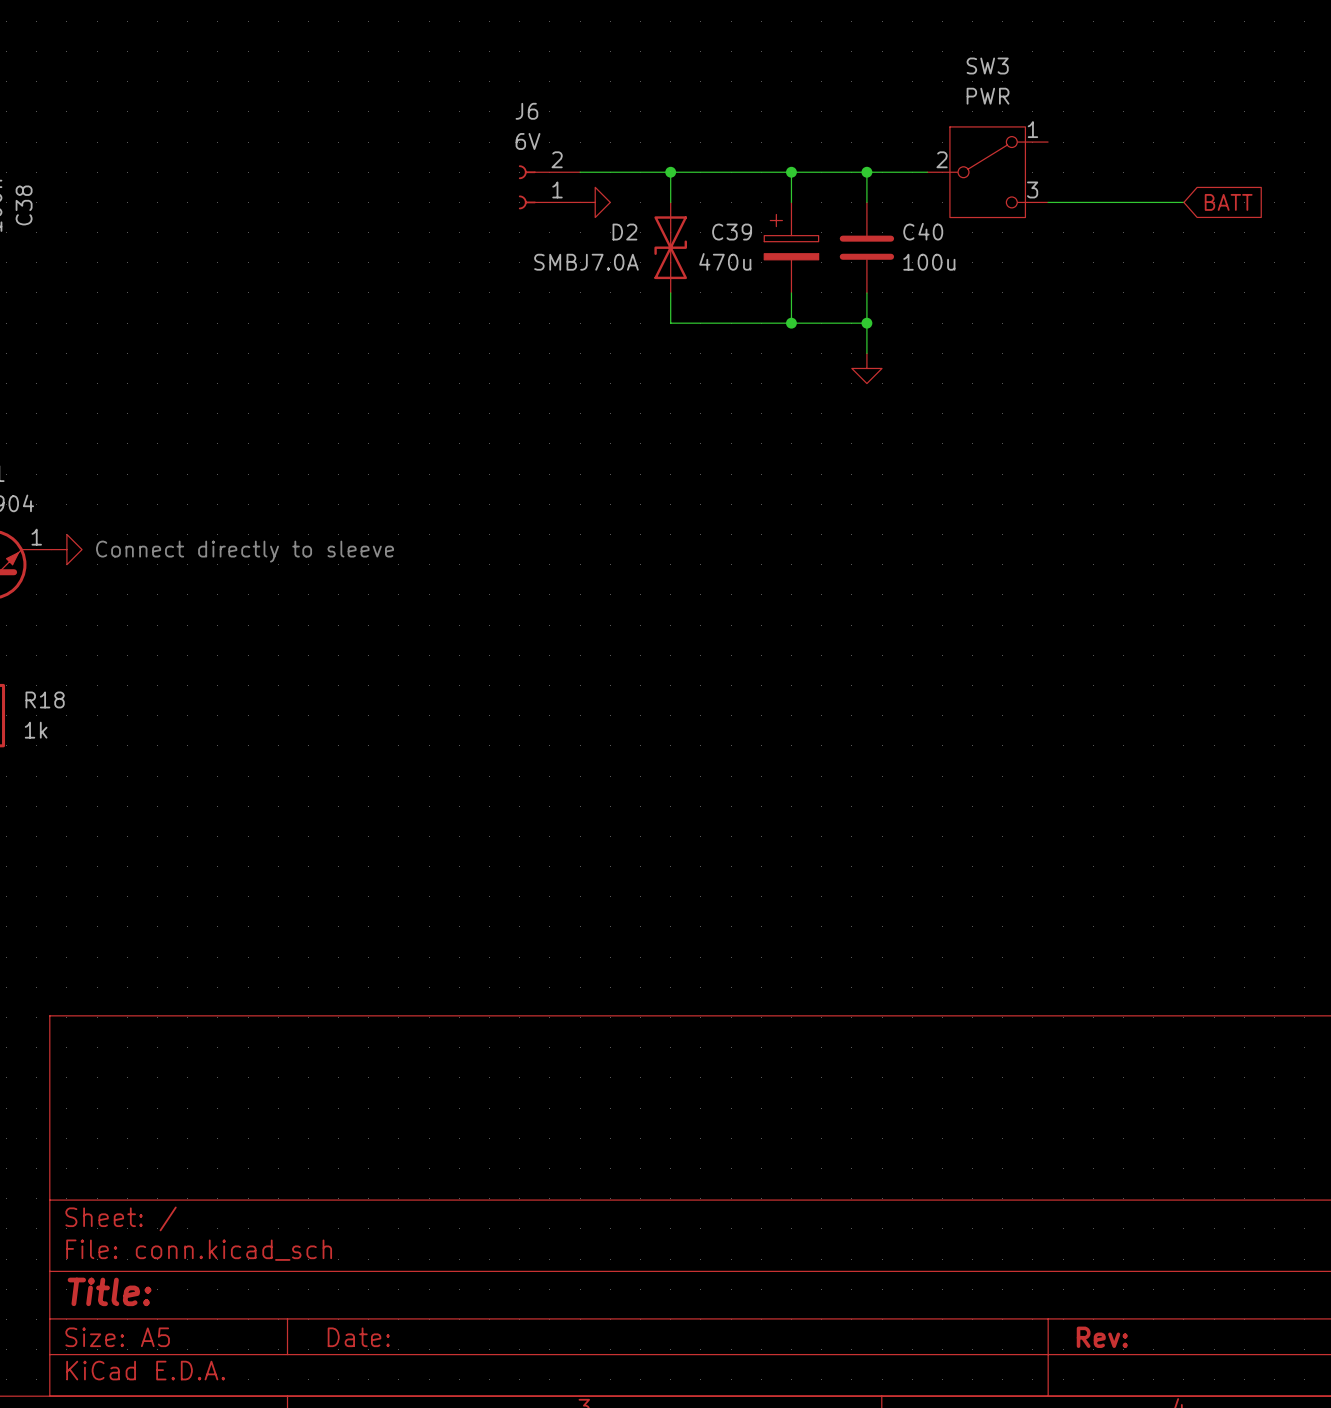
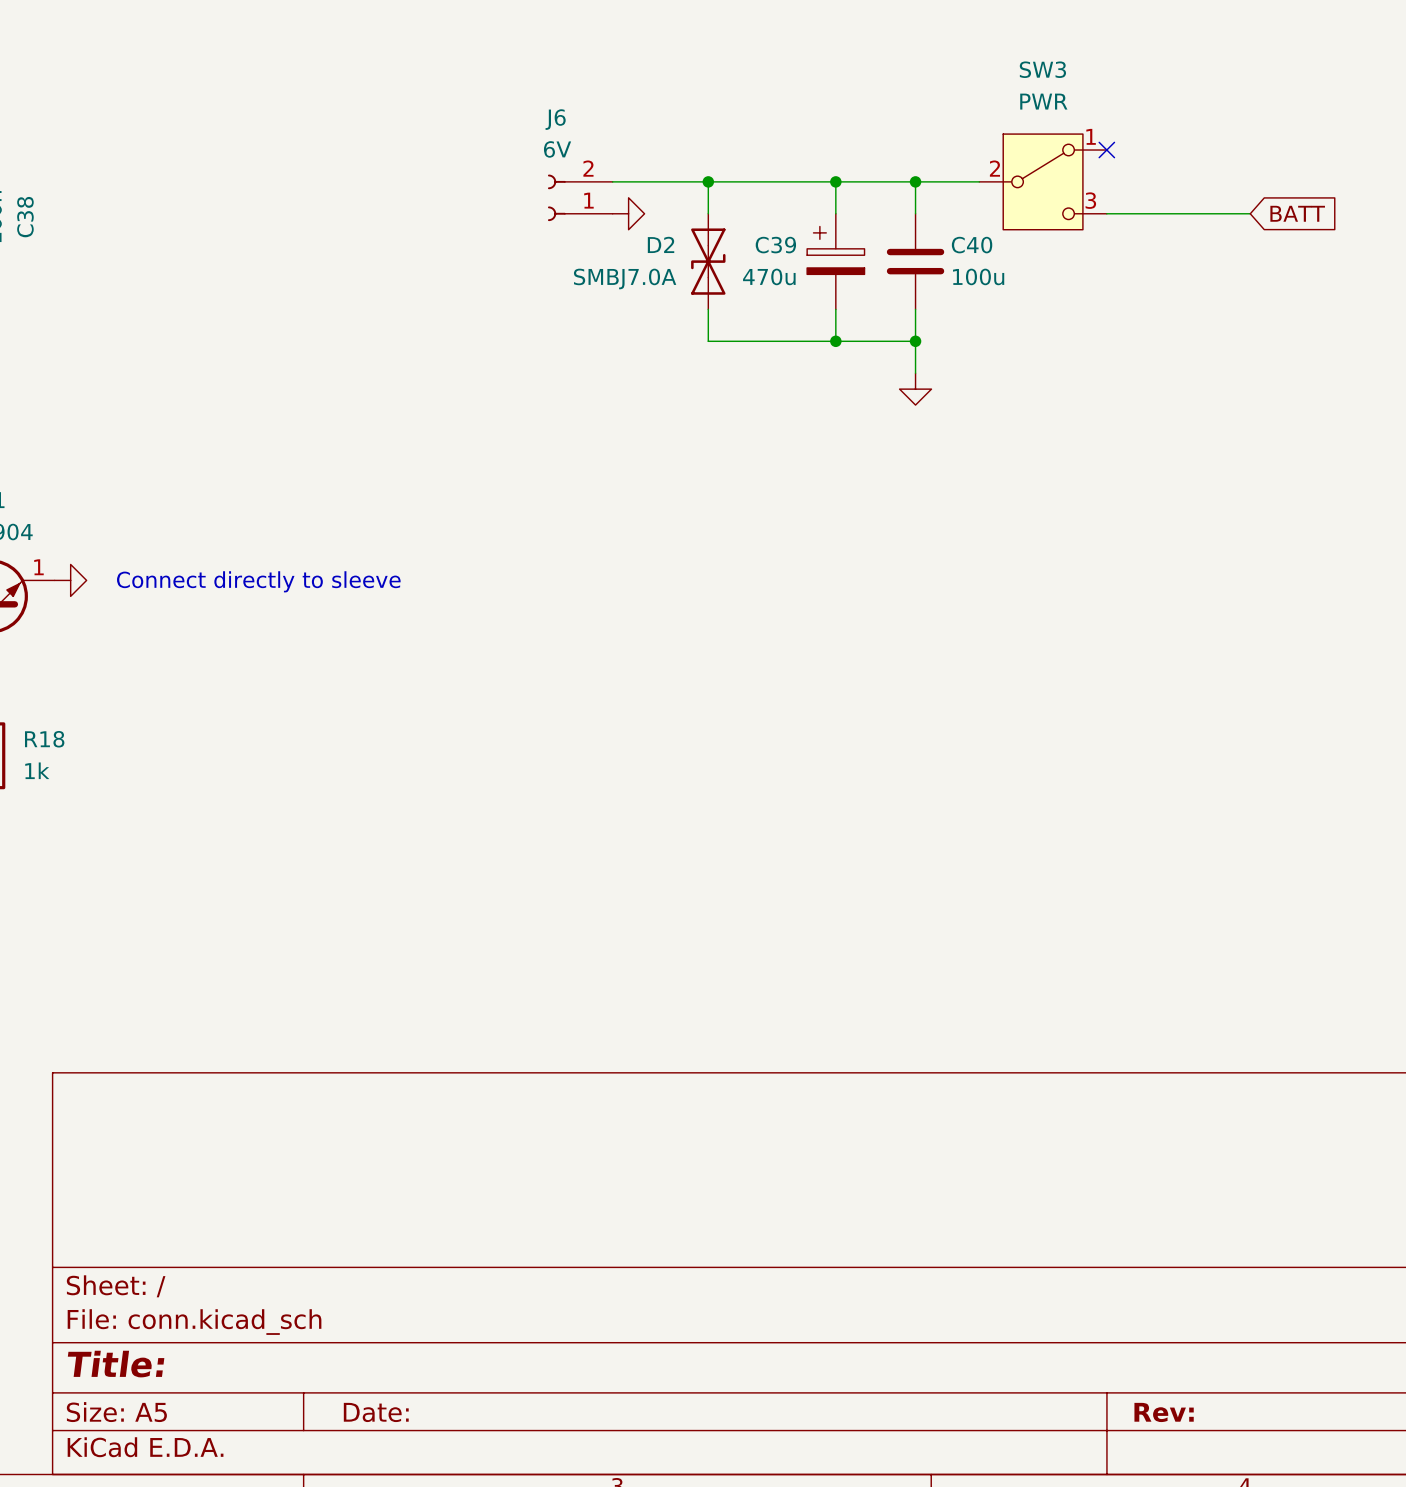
no-connect mark: none -> (1106, 150)

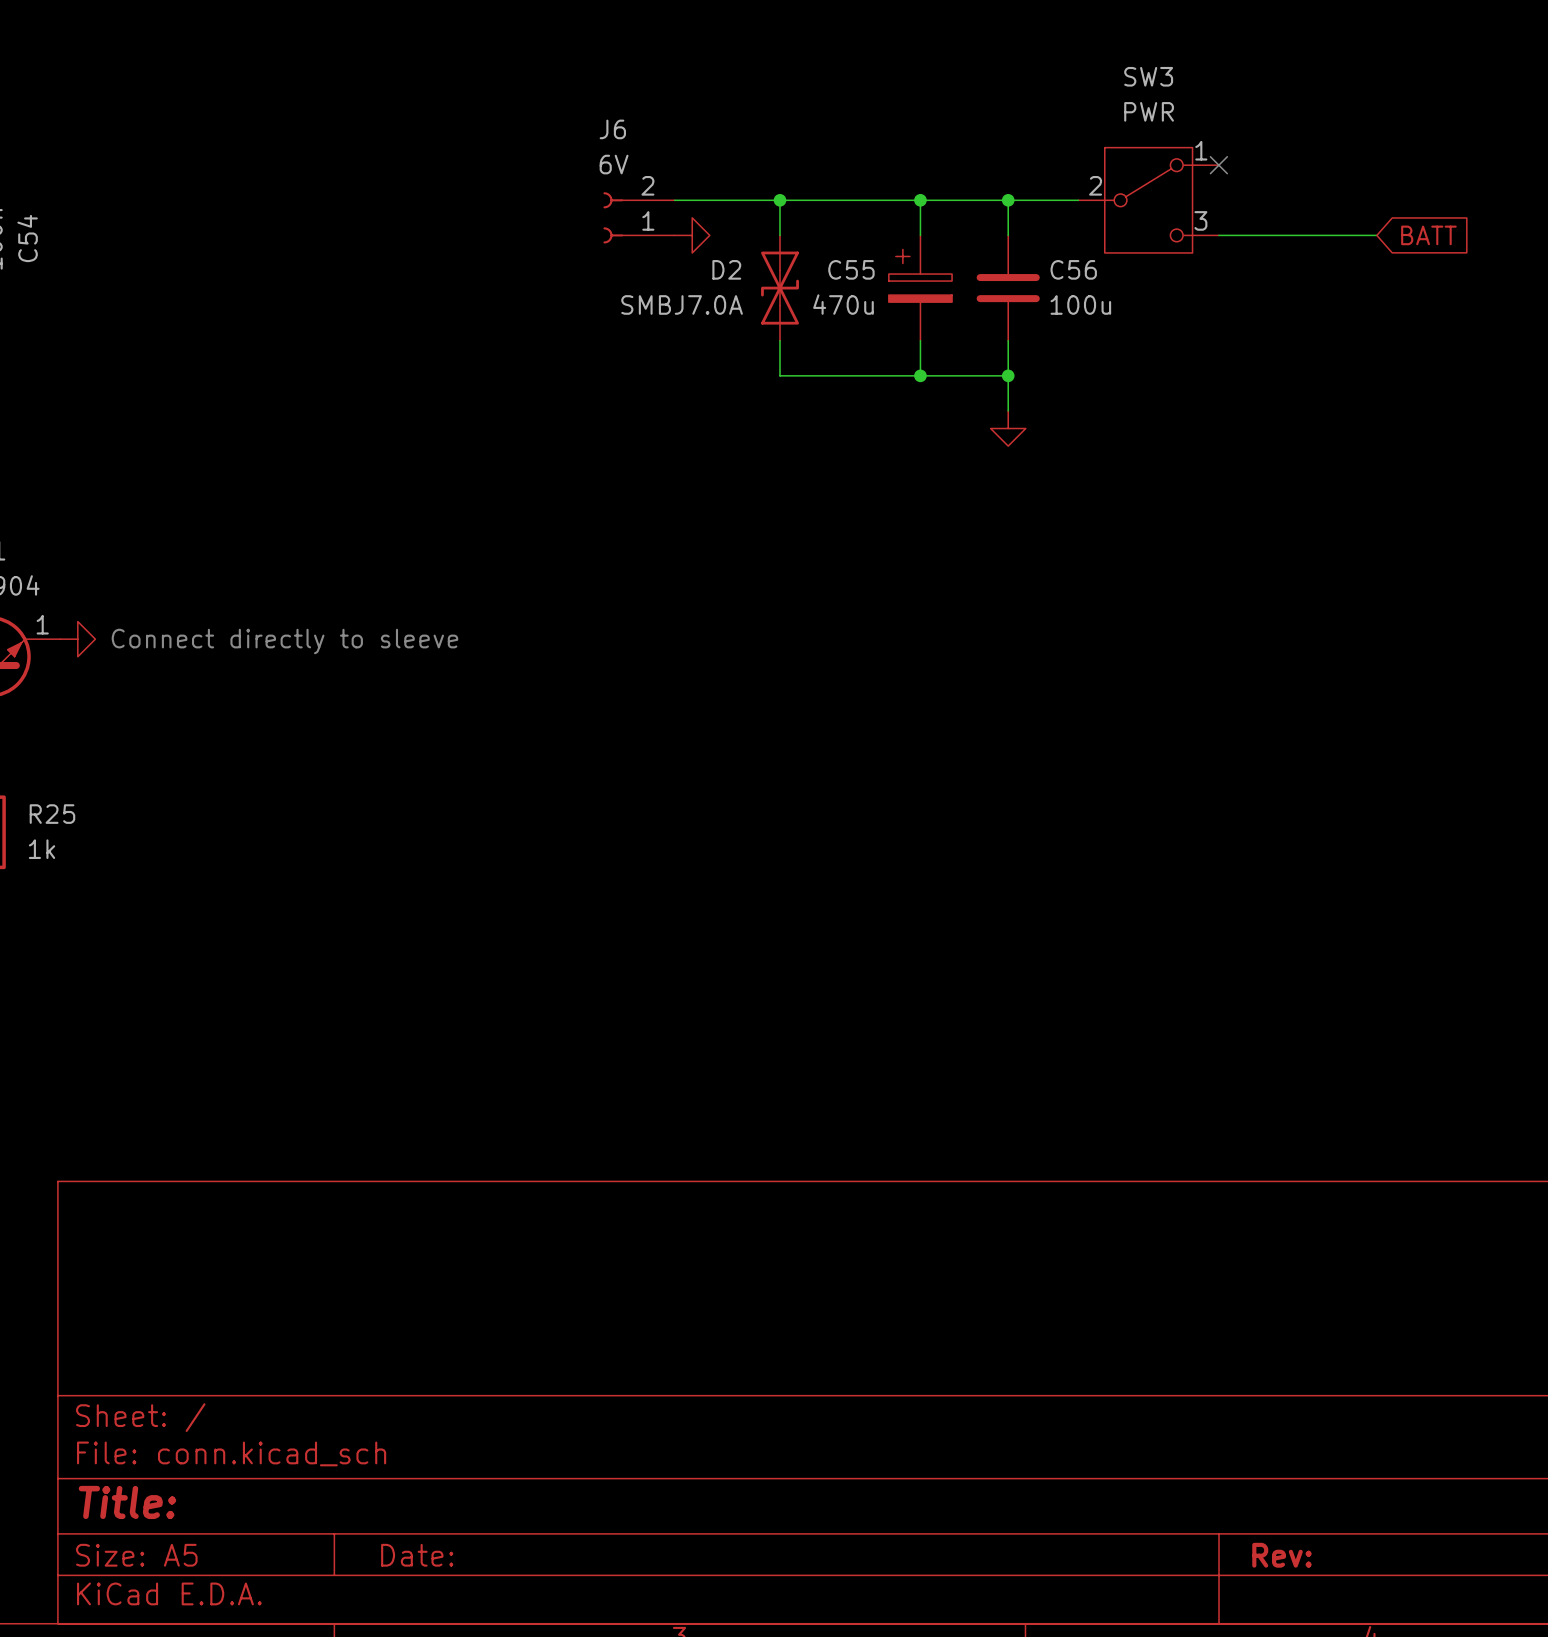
C38 name: C38 (25, 217) -> C54 (27, 238)
C39 name: C39 (775, 245) -> C55 (851, 269)
C40 name: C40 (972, 245) -> C56 (1073, 269)
R18 name: R18 (44, 739) -> R25 (52, 814)

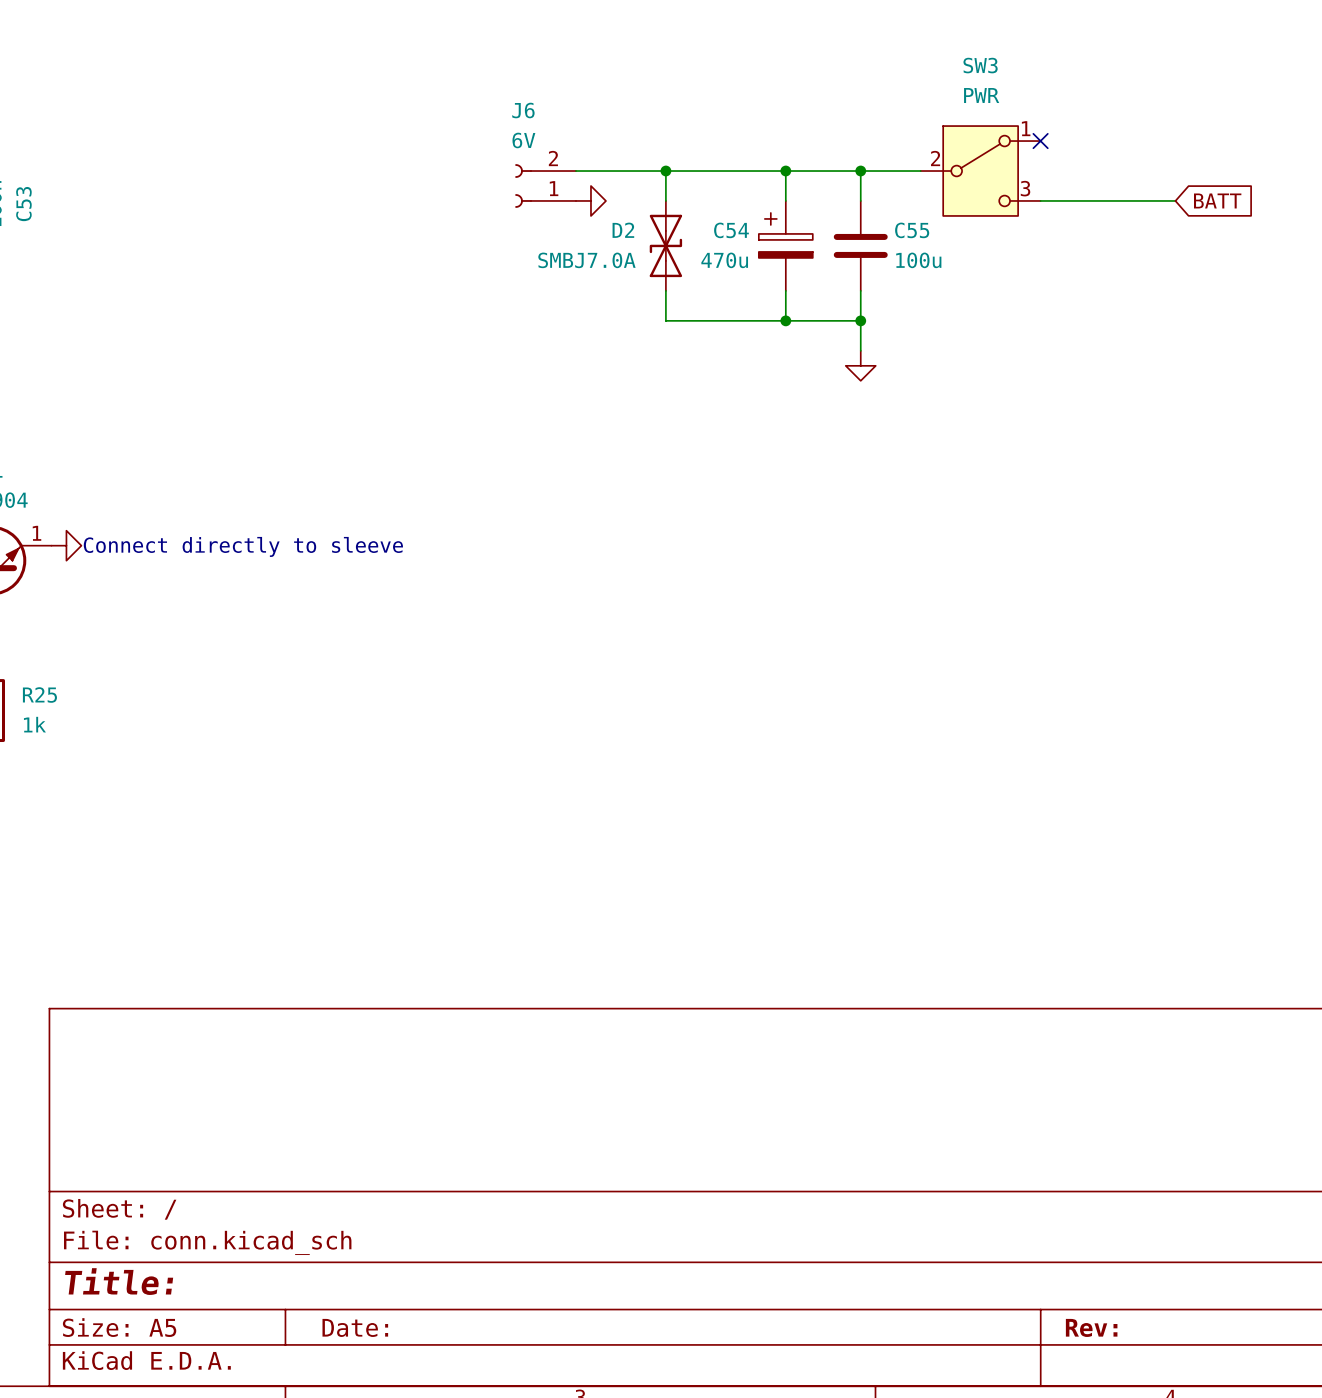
C54 name: C54 (27, 238) -> C53 (23, 204)
C55 name: C55 (851, 269) -> C54 (731, 230)
C56 name: C56 (1073, 269) -> C55 (912, 230)

